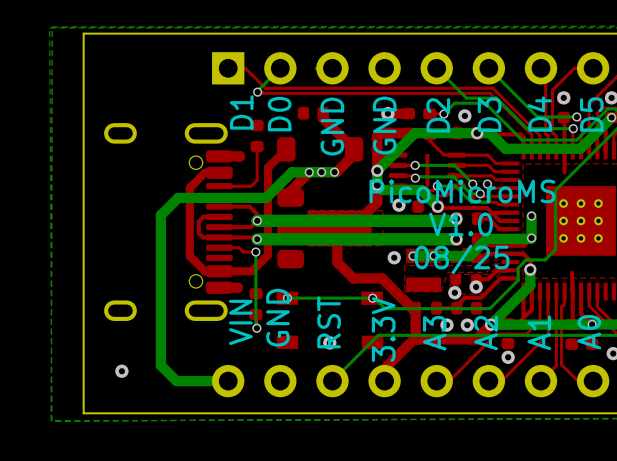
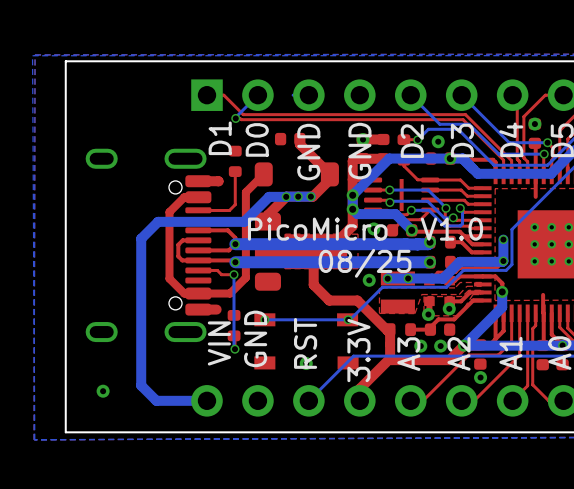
bottom track: (555, 190) (555, 249) (545, 259) (526, 259) (518, 267) (518, 280) (489, 308) (385, 308) (374, 298) -> (526, 214) (511, 229) (511, 264) (506, 270) (463, 270) (446, 287) (382, 287) (349, 319)
text: PicoMicroMS (462, 191) -> PicoMicro V1.0 (365, 229)
text: V1.0 (461, 224) -> none
text position: 08/25 (461, 259) -> 08/25 (365, 263)

